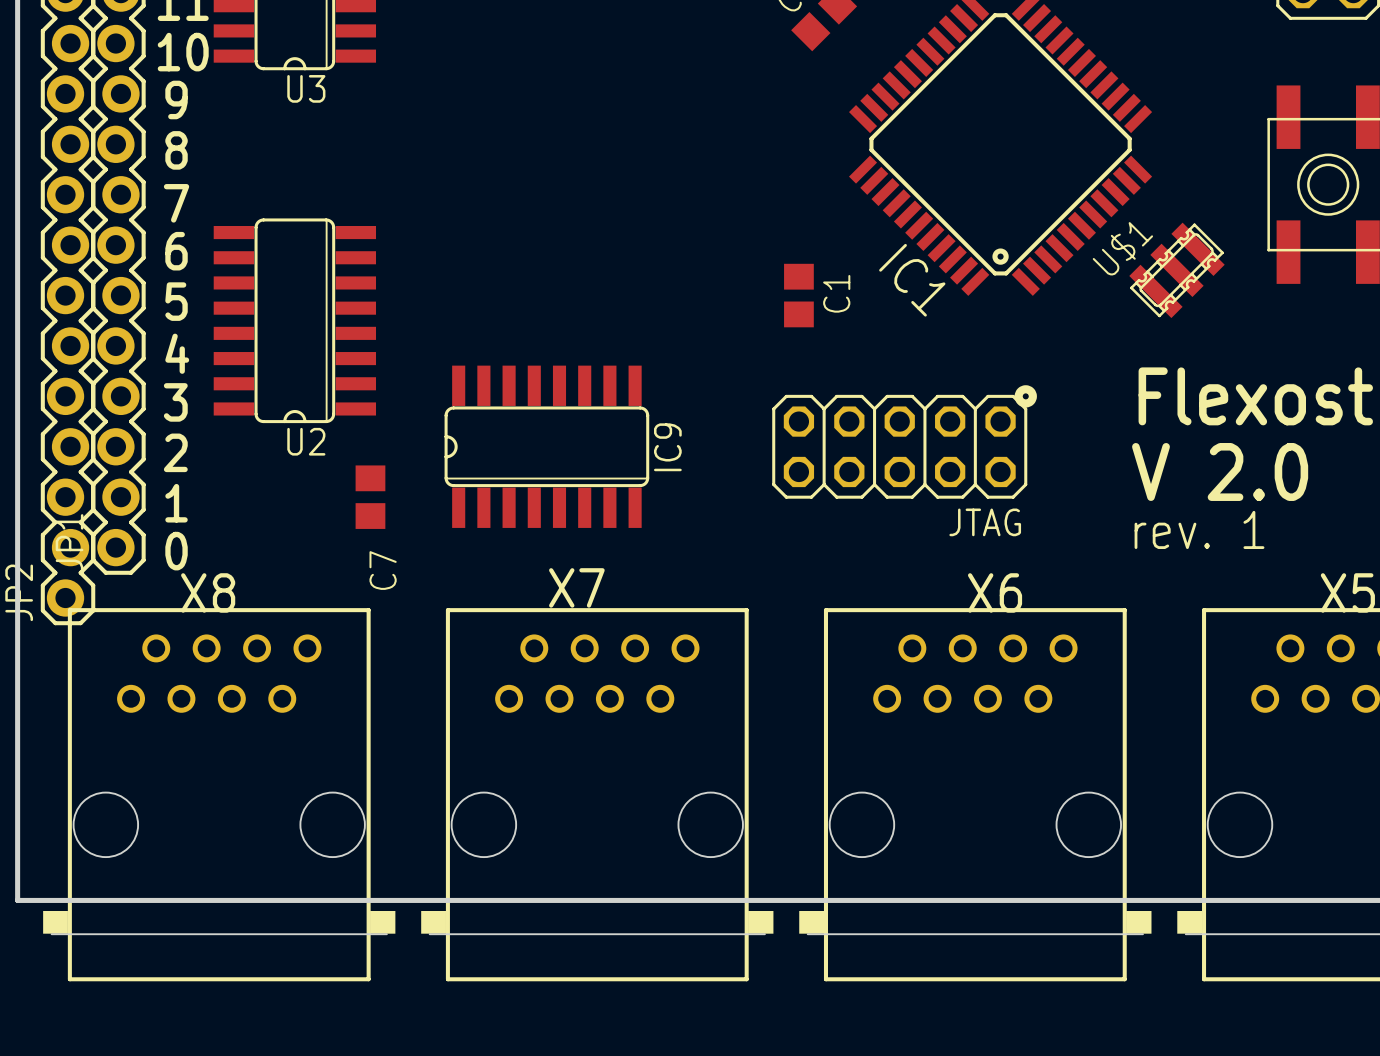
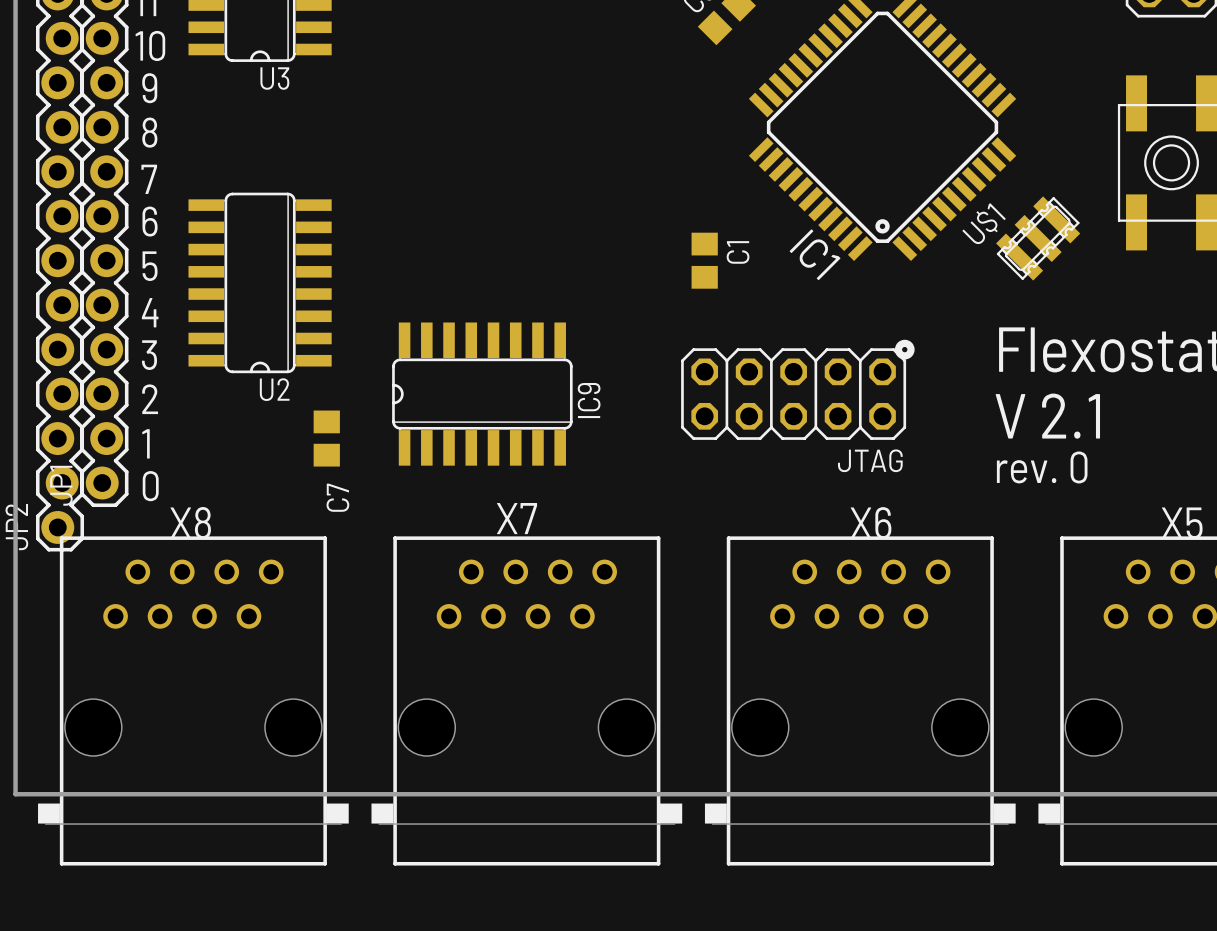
text: V 2.0 (1220, 471) -> V 2.1 (1047, 416)
text: rev. 1 (1199, 529) -> rev. 0 (1042, 467)

